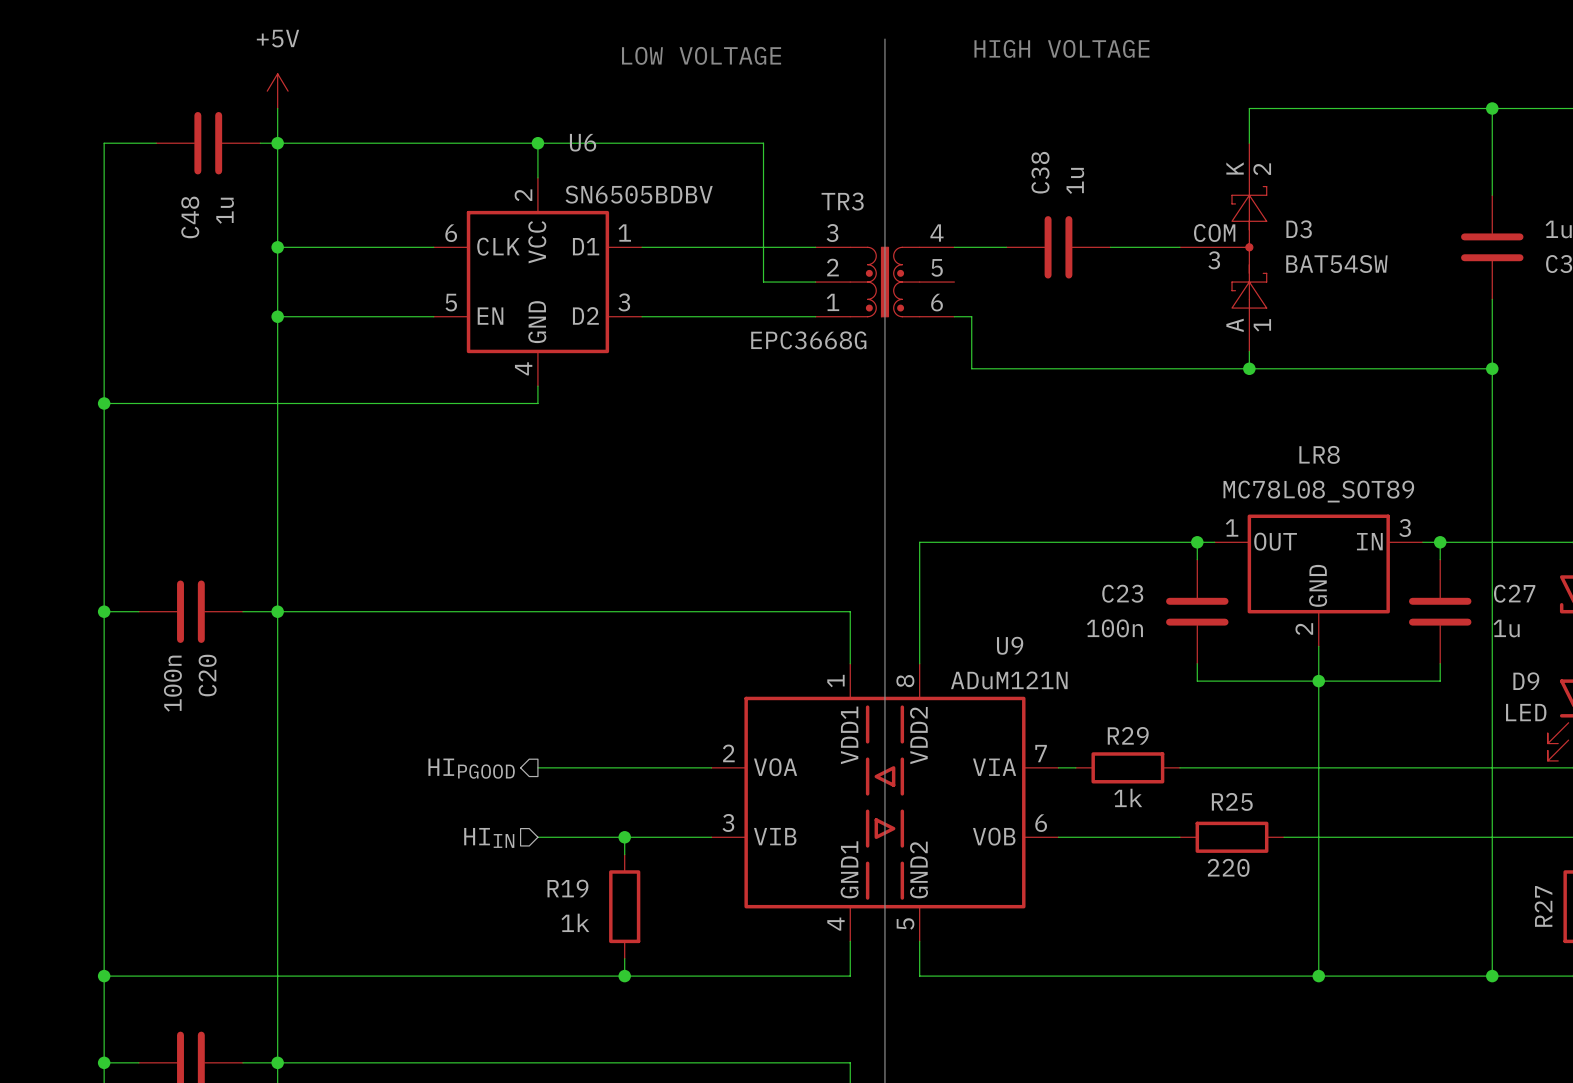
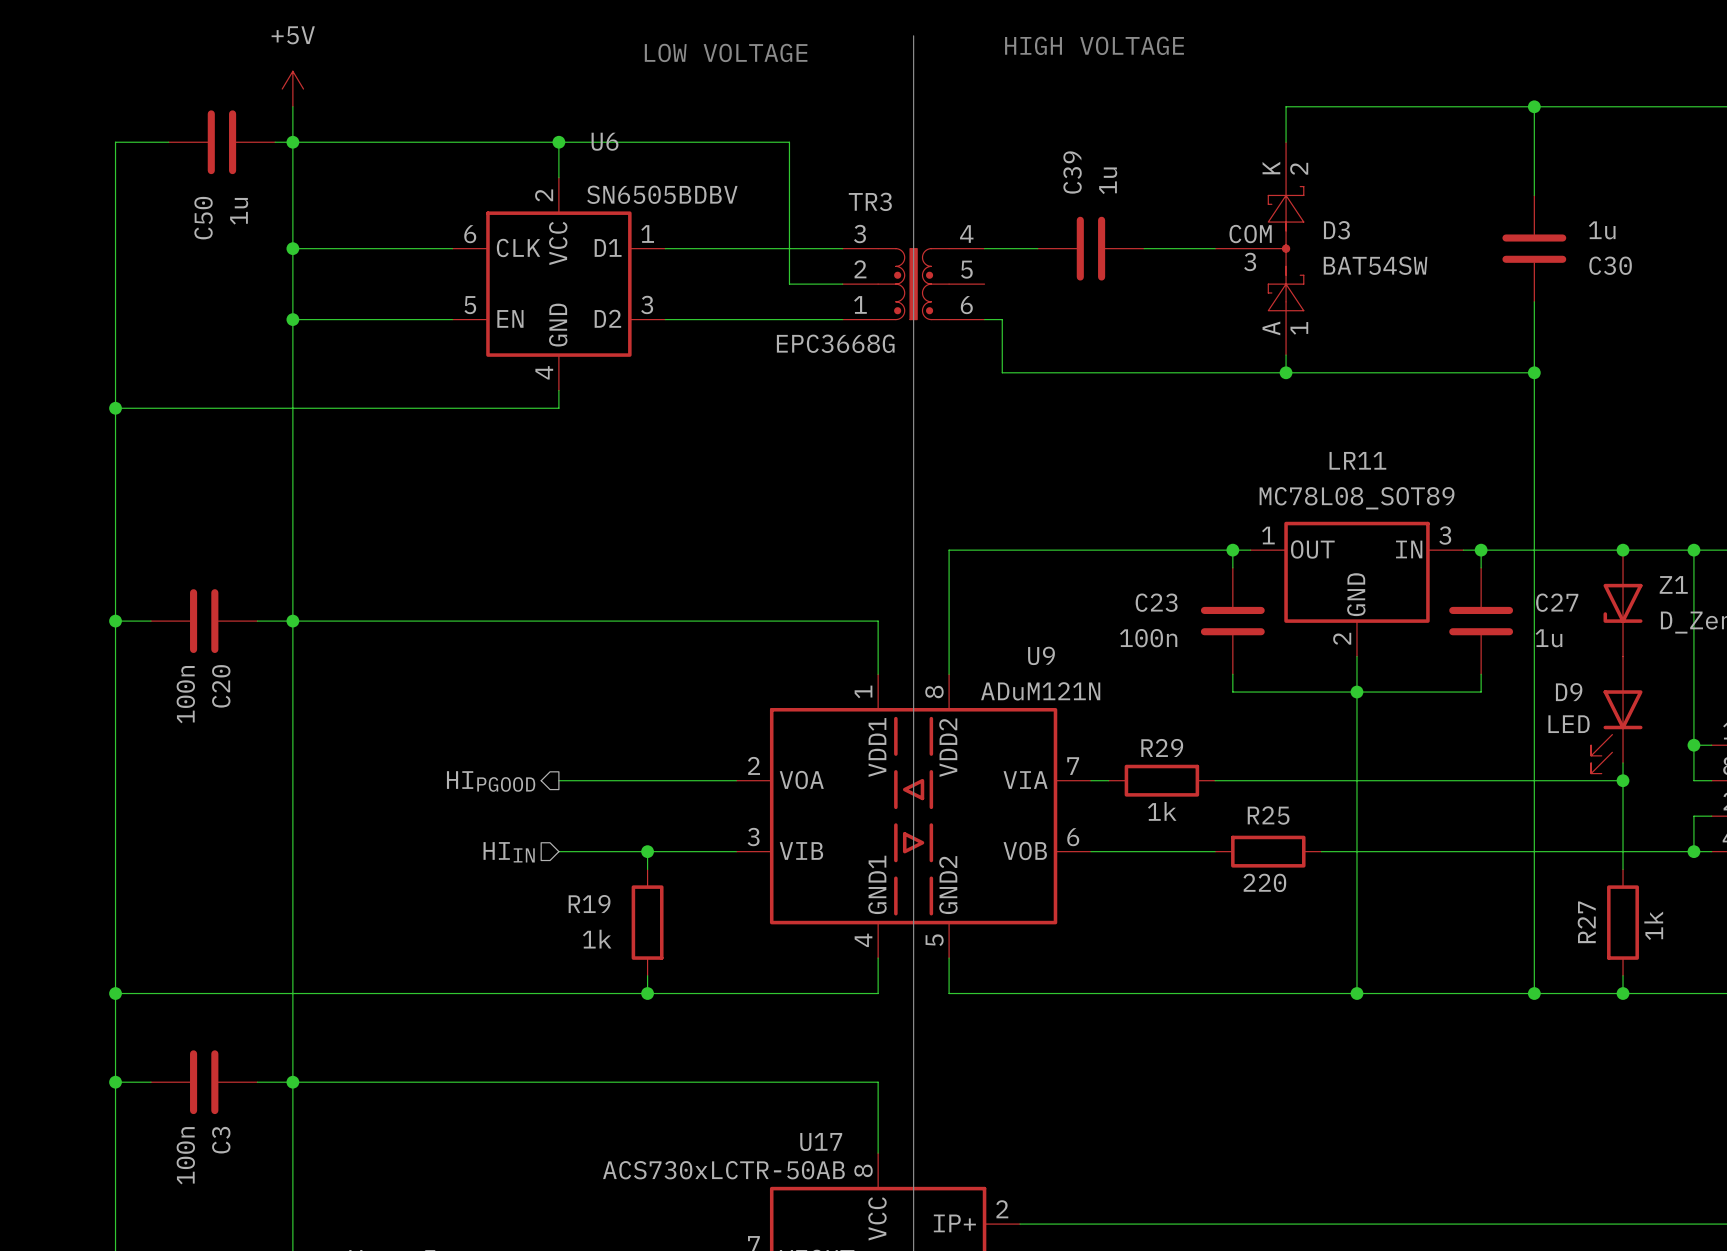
C38 name: C38 (1040, 172) -> C39 (1072, 172)
C48 name: C48 (190, 217) -> C50 (203, 218)
LR8 name: LR8 (1319, 454) -> LR11 (1357, 460)

